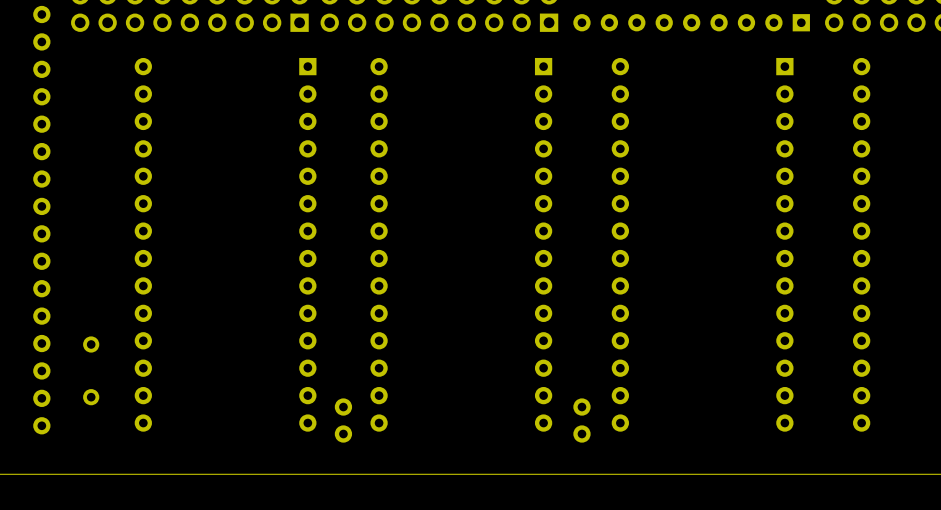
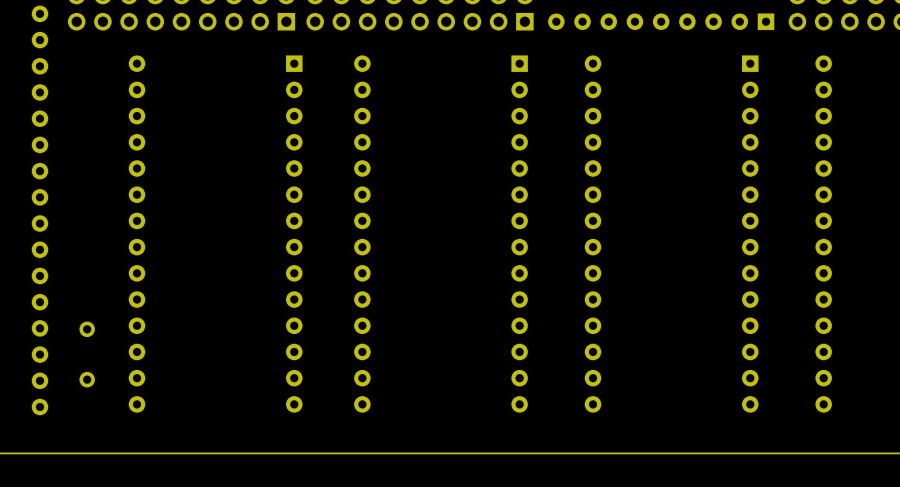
part: (343, 420) -> none
part: (581, 420) -> none

